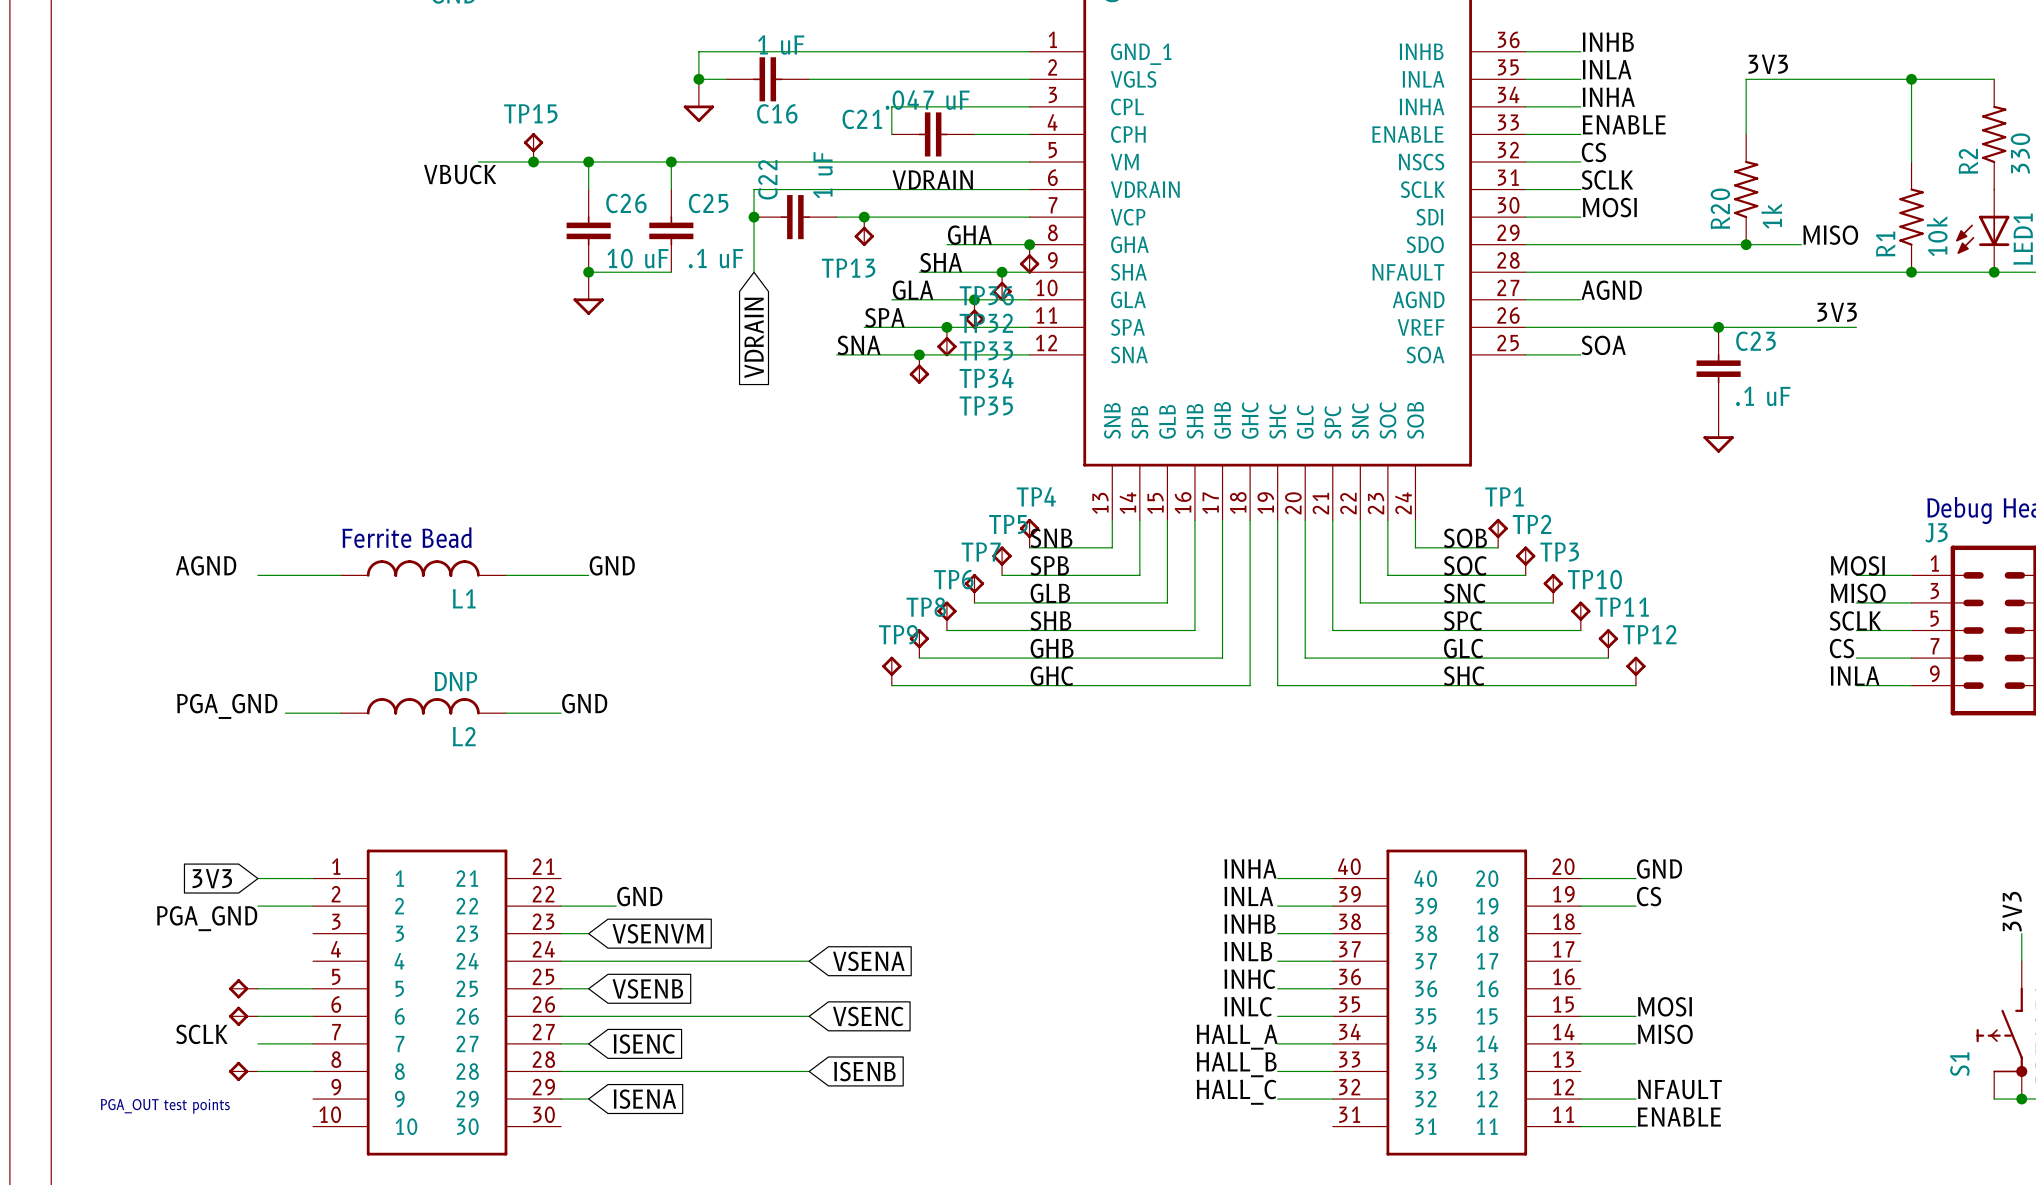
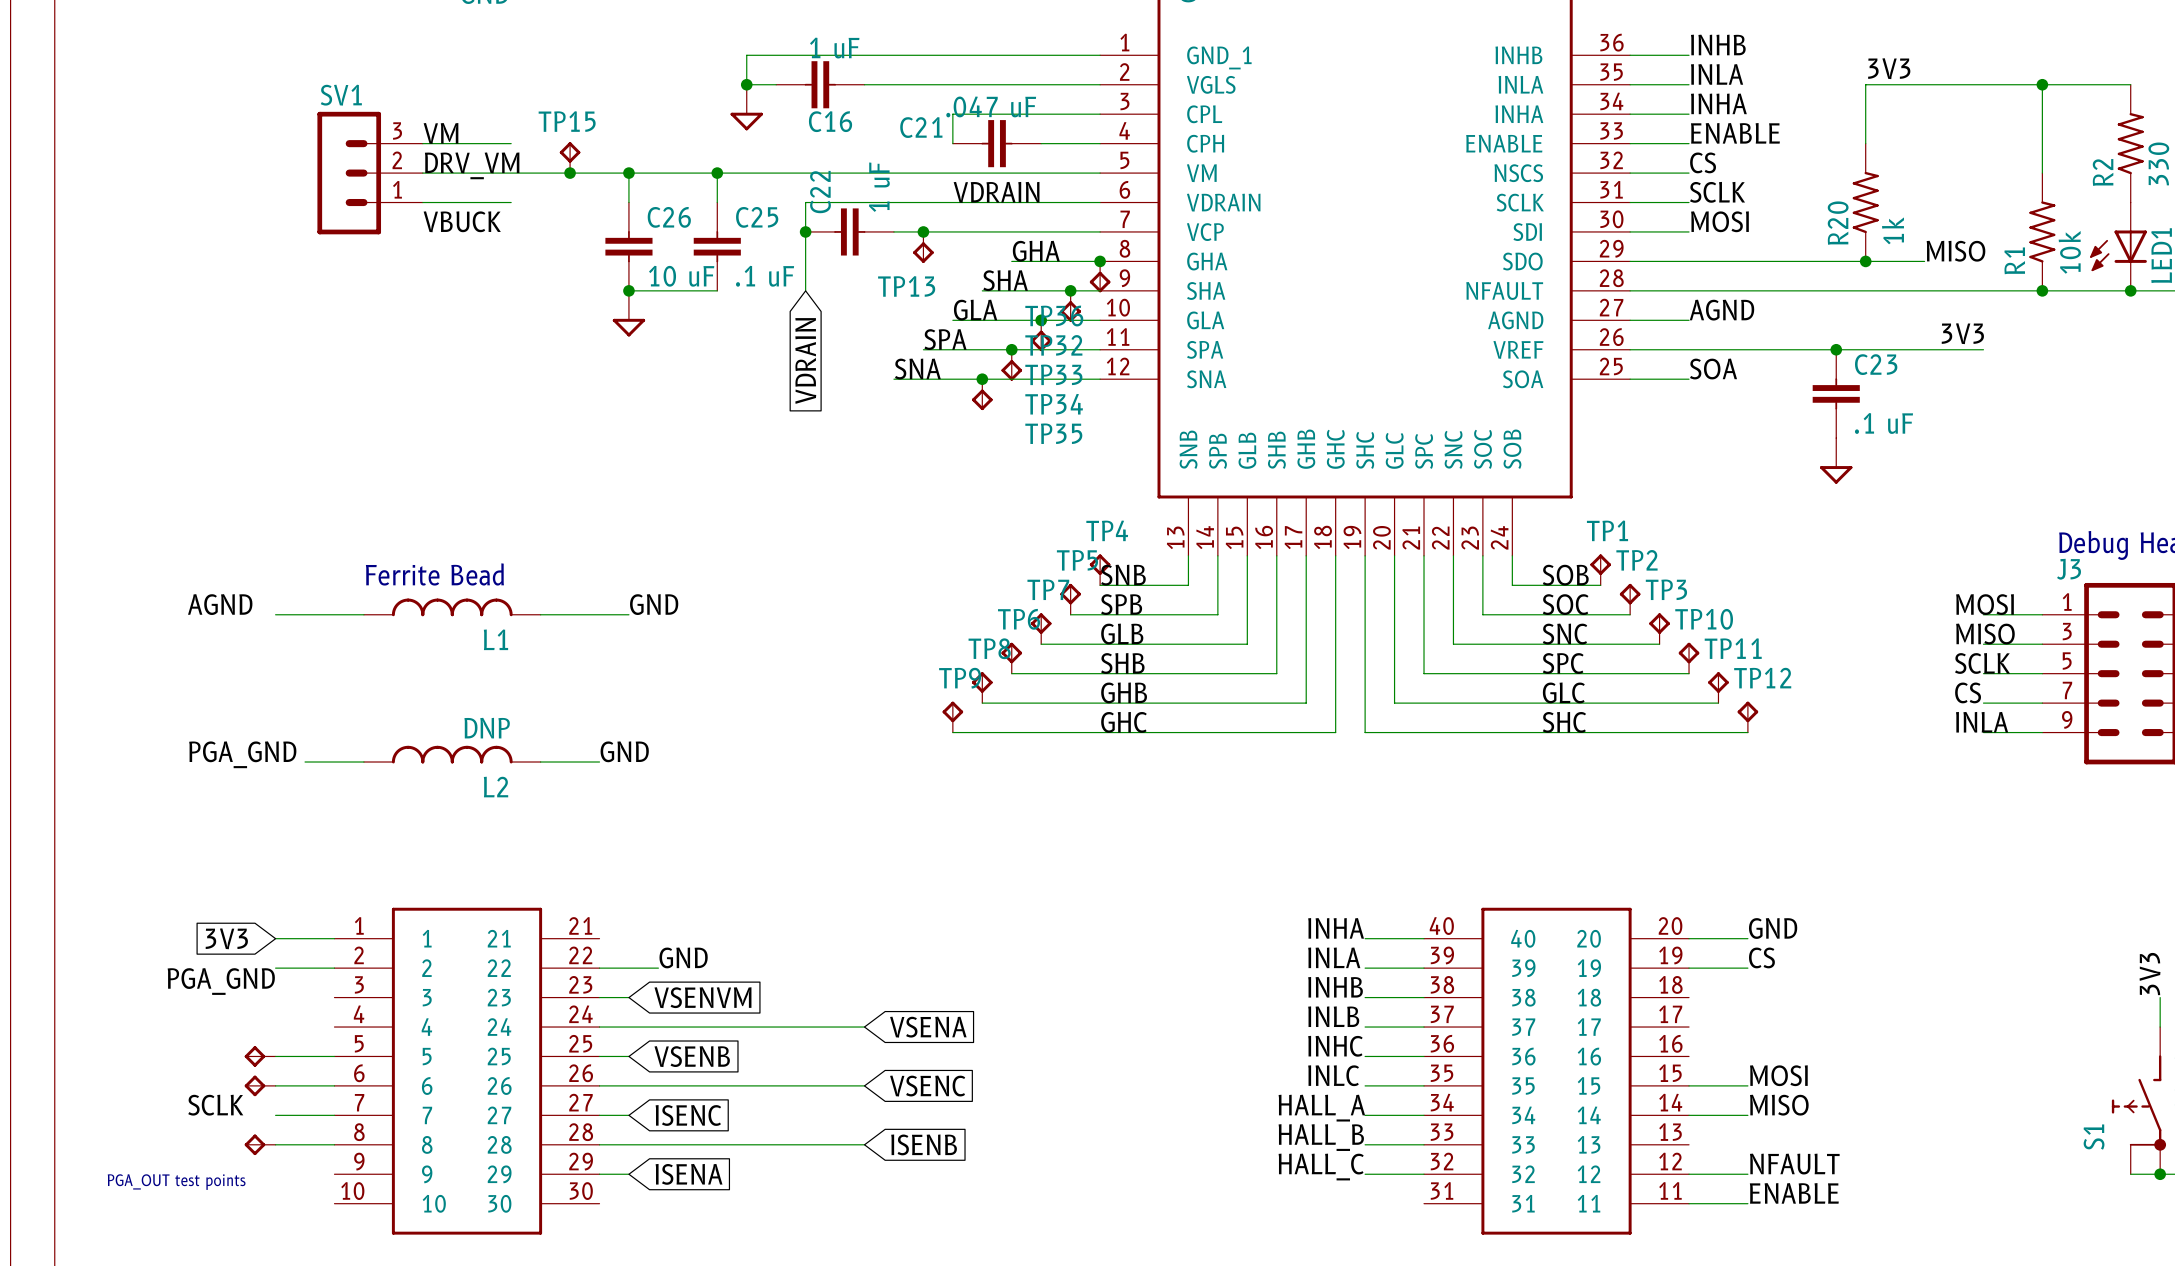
label: none -> VM (441, 133)
wire: none -> (422, 143) (511, 143)
label: none -> DRV_VM (472, 165)
SV1: none -> (370, 173)
wire: none -> (422, 173) (511, 173)
label position: VBUCK (460, 174) -> VBUCK (462, 221)
wire: none -> (422, 202) (511, 202)

